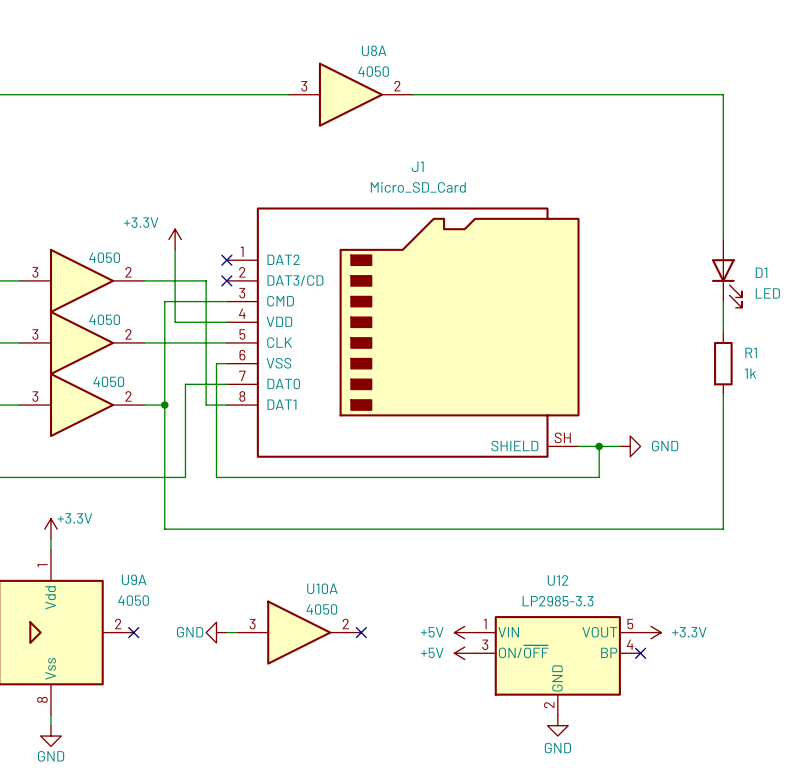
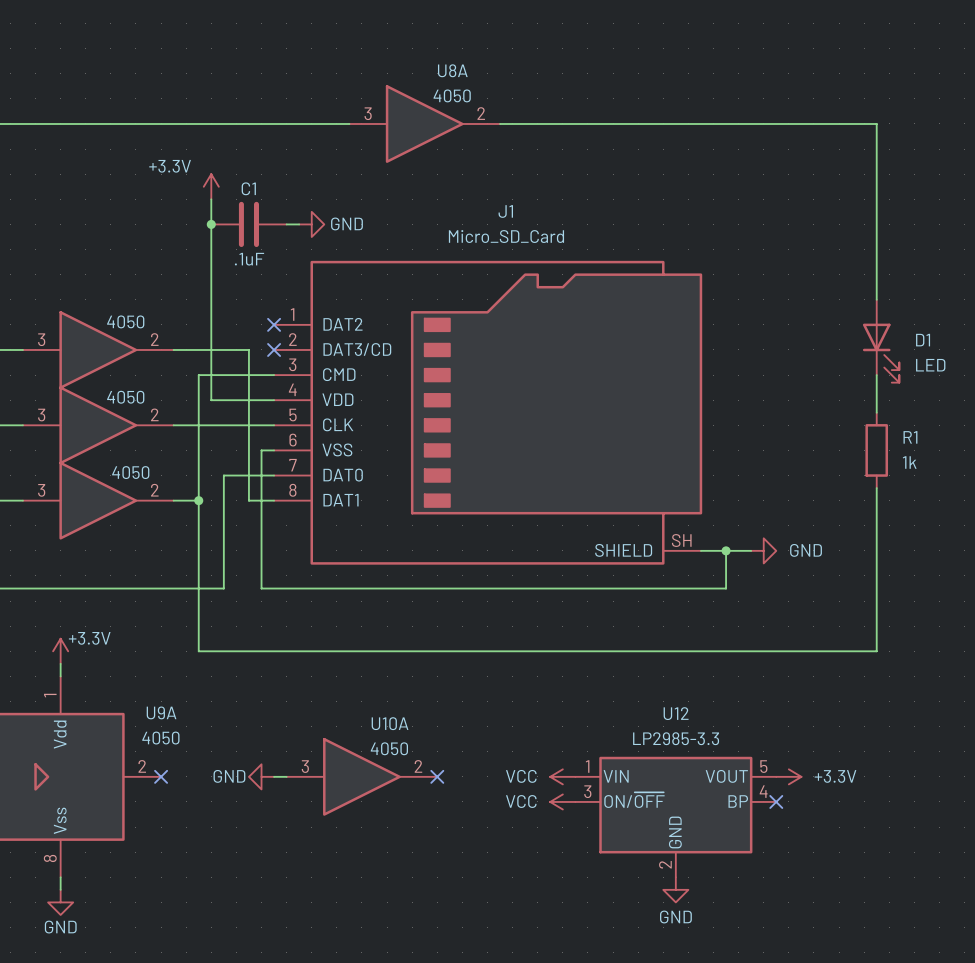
wire: none -> (211, 199) (211, 312)
junction: none -> (211, 224)
C1: none -> .1uF (248, 224)
wire: none -> (286, 224) (299, 224)
power symbol: none -> GND (311, 224)
power symbol position: +3.3V (175, 239) -> +3.3V (211, 186)
power symbol: +5V (464, 632) -> VCC (562, 776)
power symbol: +5V (464, 653) -> VCC (562, 801)

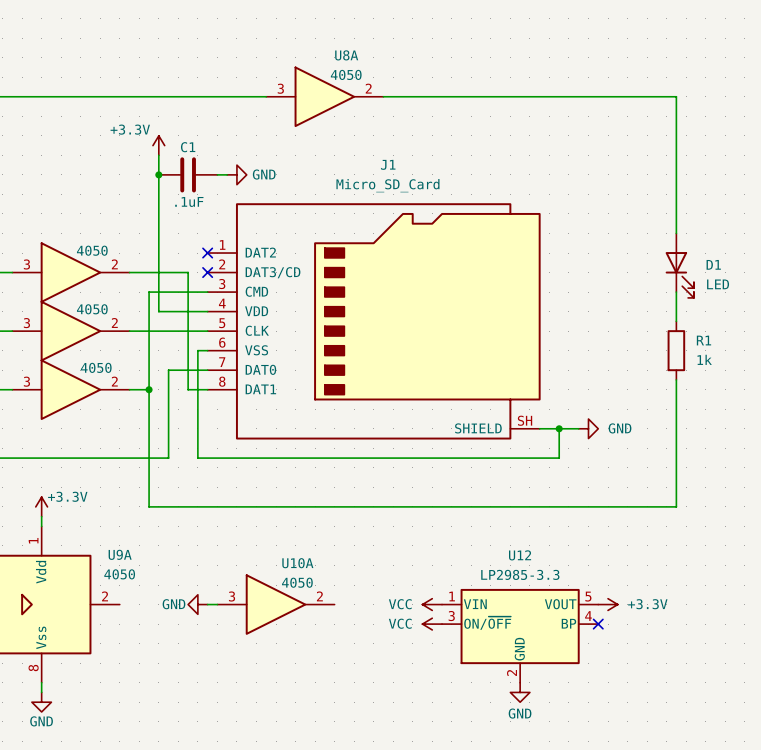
no-connect mark: (161, 776) -> none
no-connect mark: (437, 776) -> none

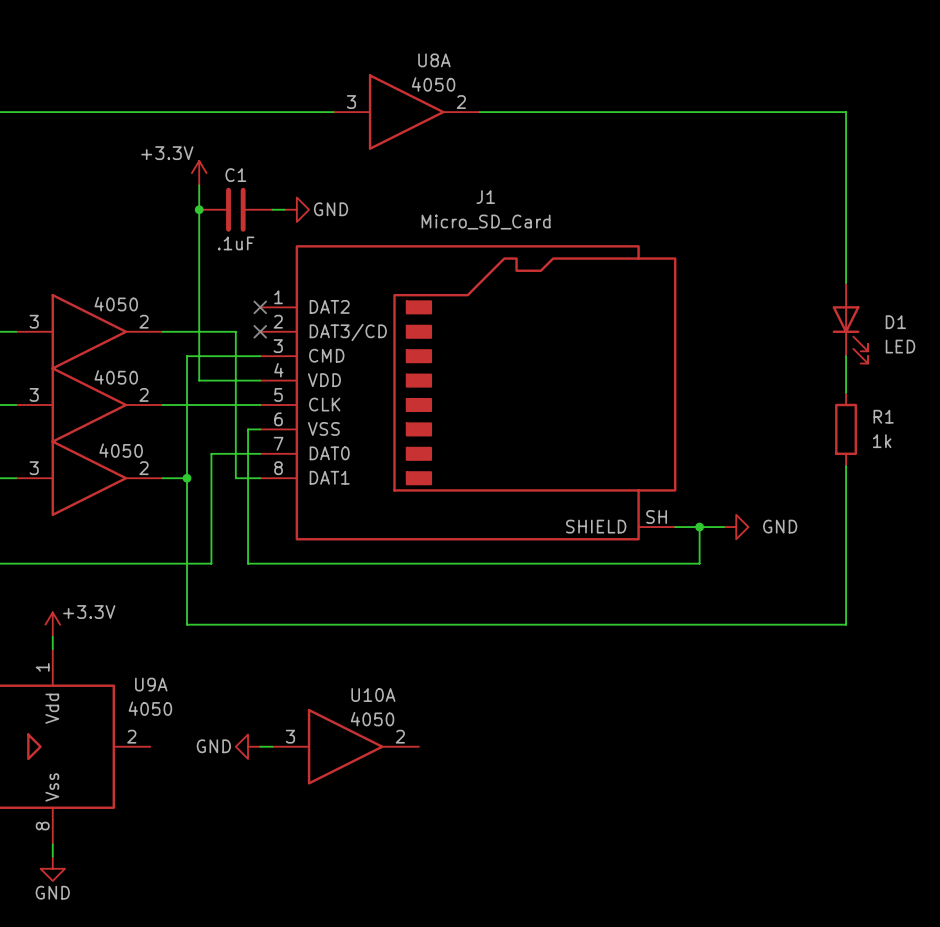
power symbol: VCC (432, 604) -> none
power symbol: +3.3V (608, 604) -> none
power symbol: VCC (432, 624) -> none
no-connect mark: (598, 624) -> none
U12: LP2985-3.3 (520, 635) -> none
power symbol: GND (520, 692) -> none

